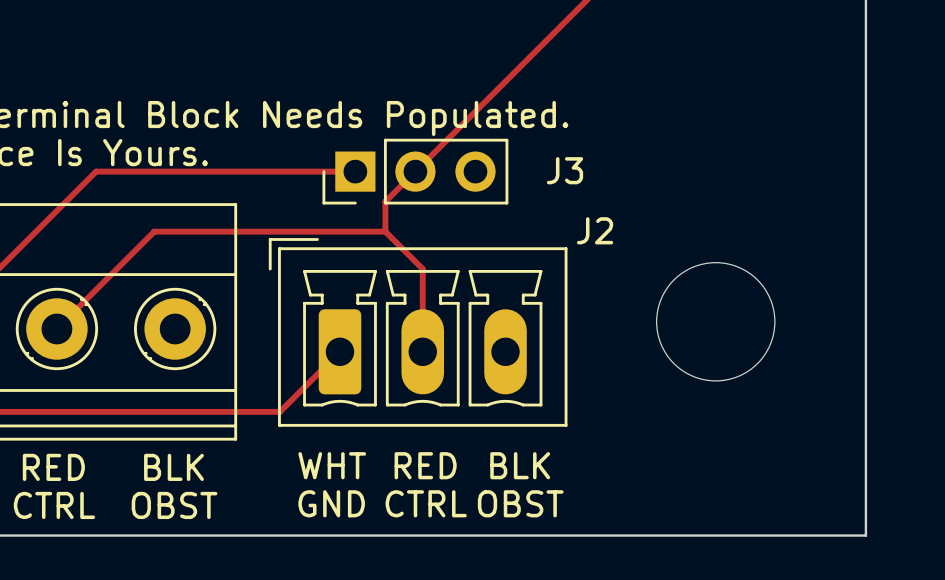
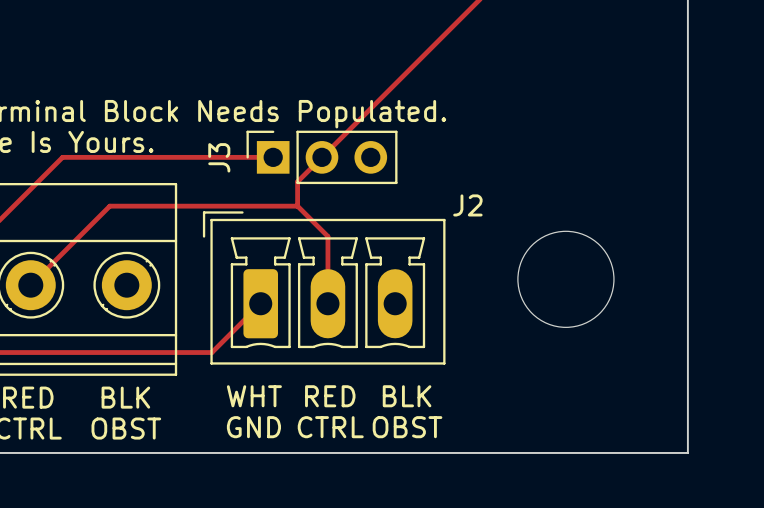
J3 footprint: [322, 138, 509, 205] -> [246, 130, 398, 185]
J3 name position: J3 (565, 170) -> J3 (219, 157)

